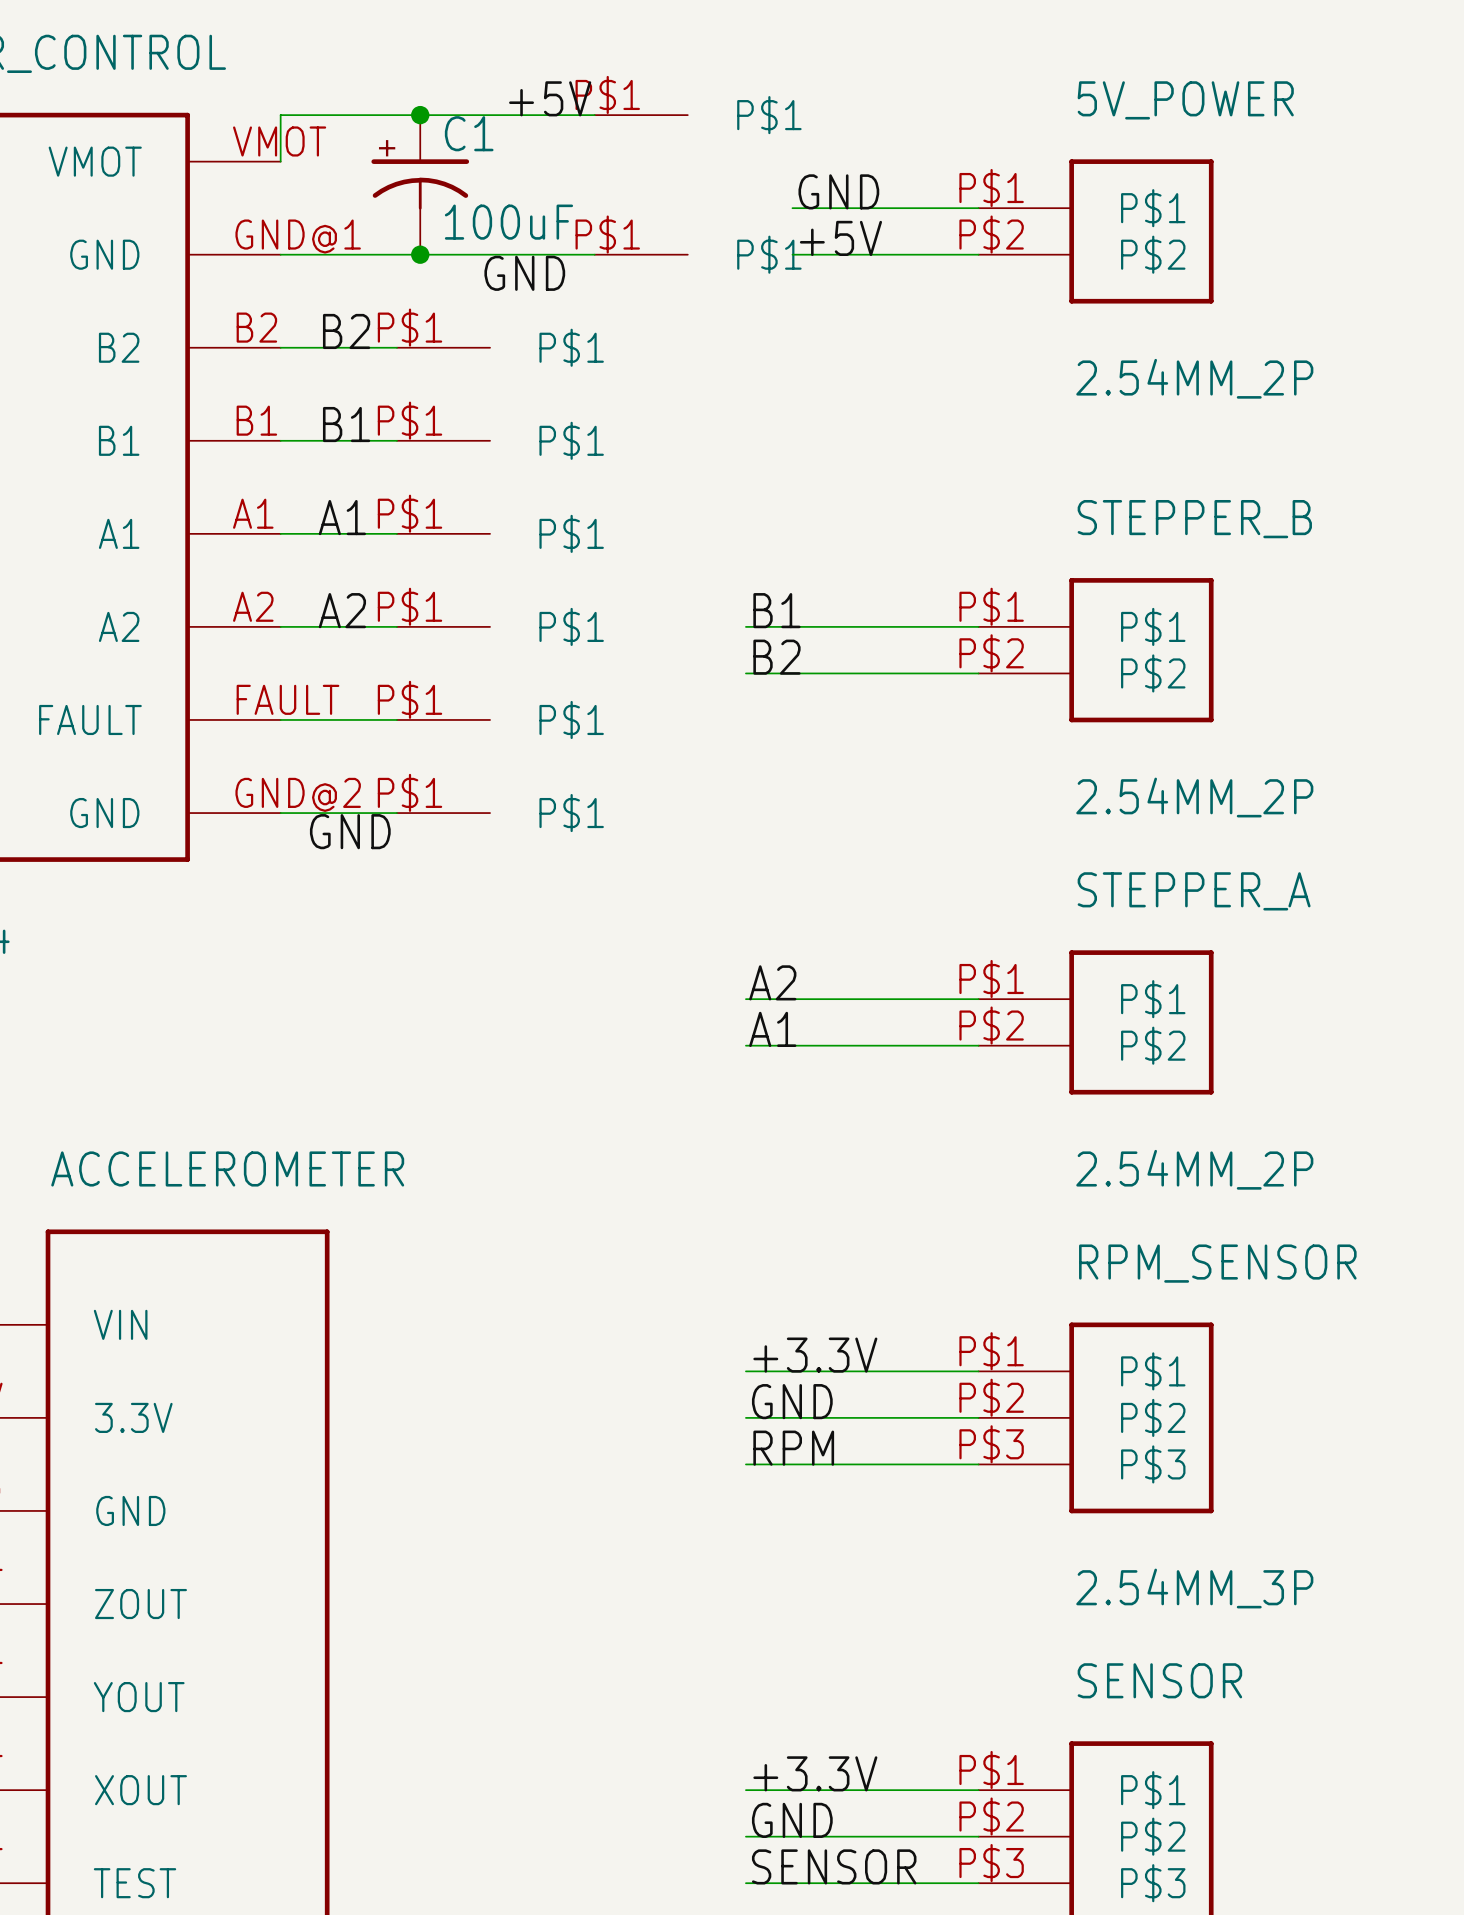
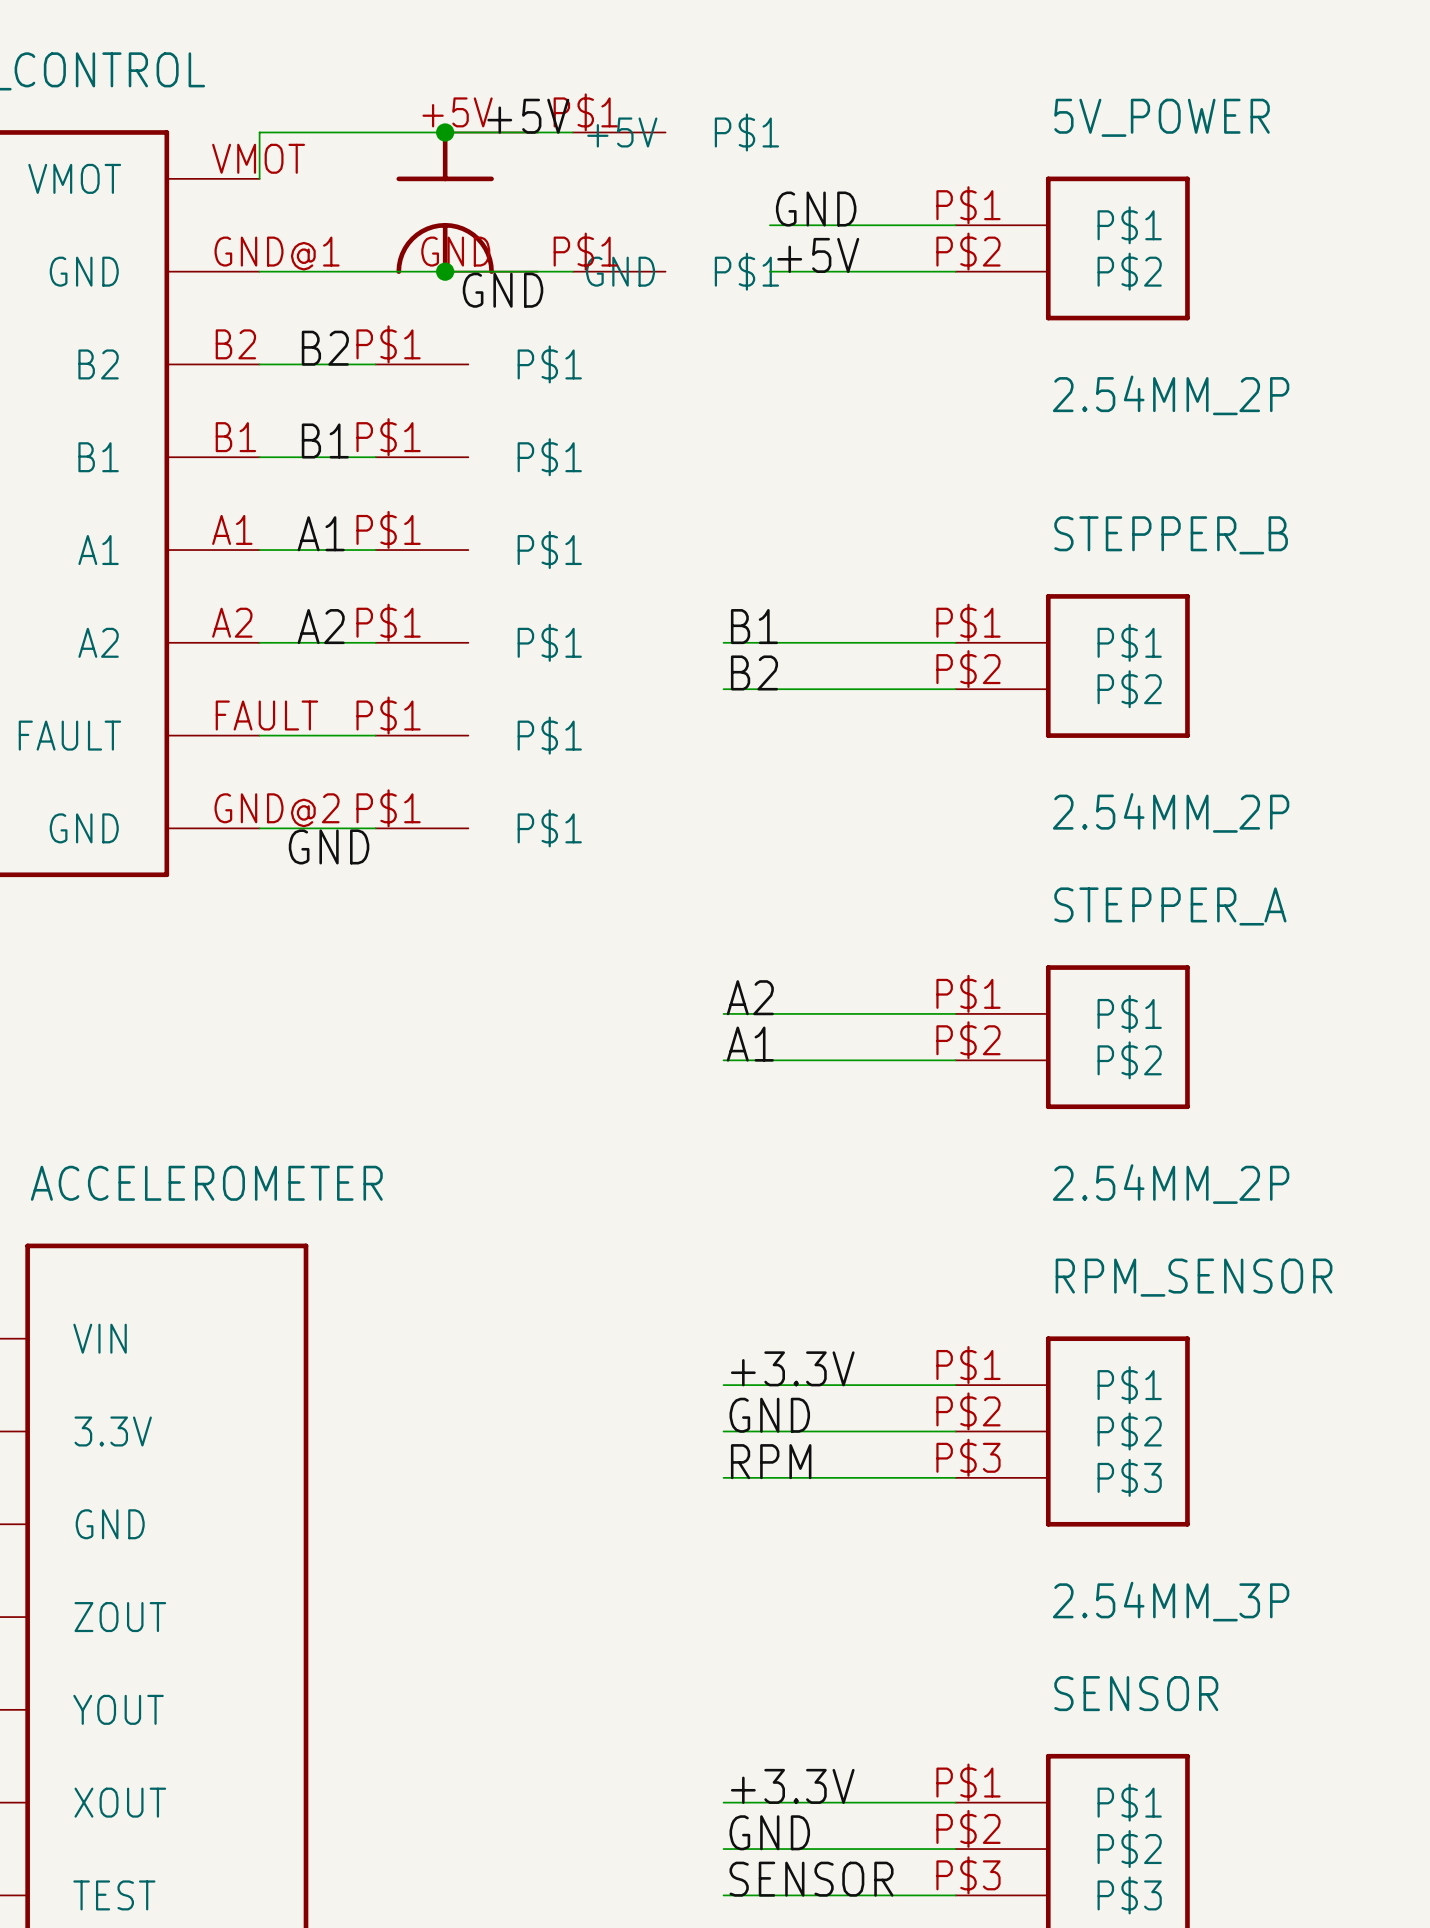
junction position: (420, 115) -> (445, 132)
C1: 100uF (420, 184) -> none
part: none -> (467, 202)
junction position: (420, 254) -> (445, 271)

